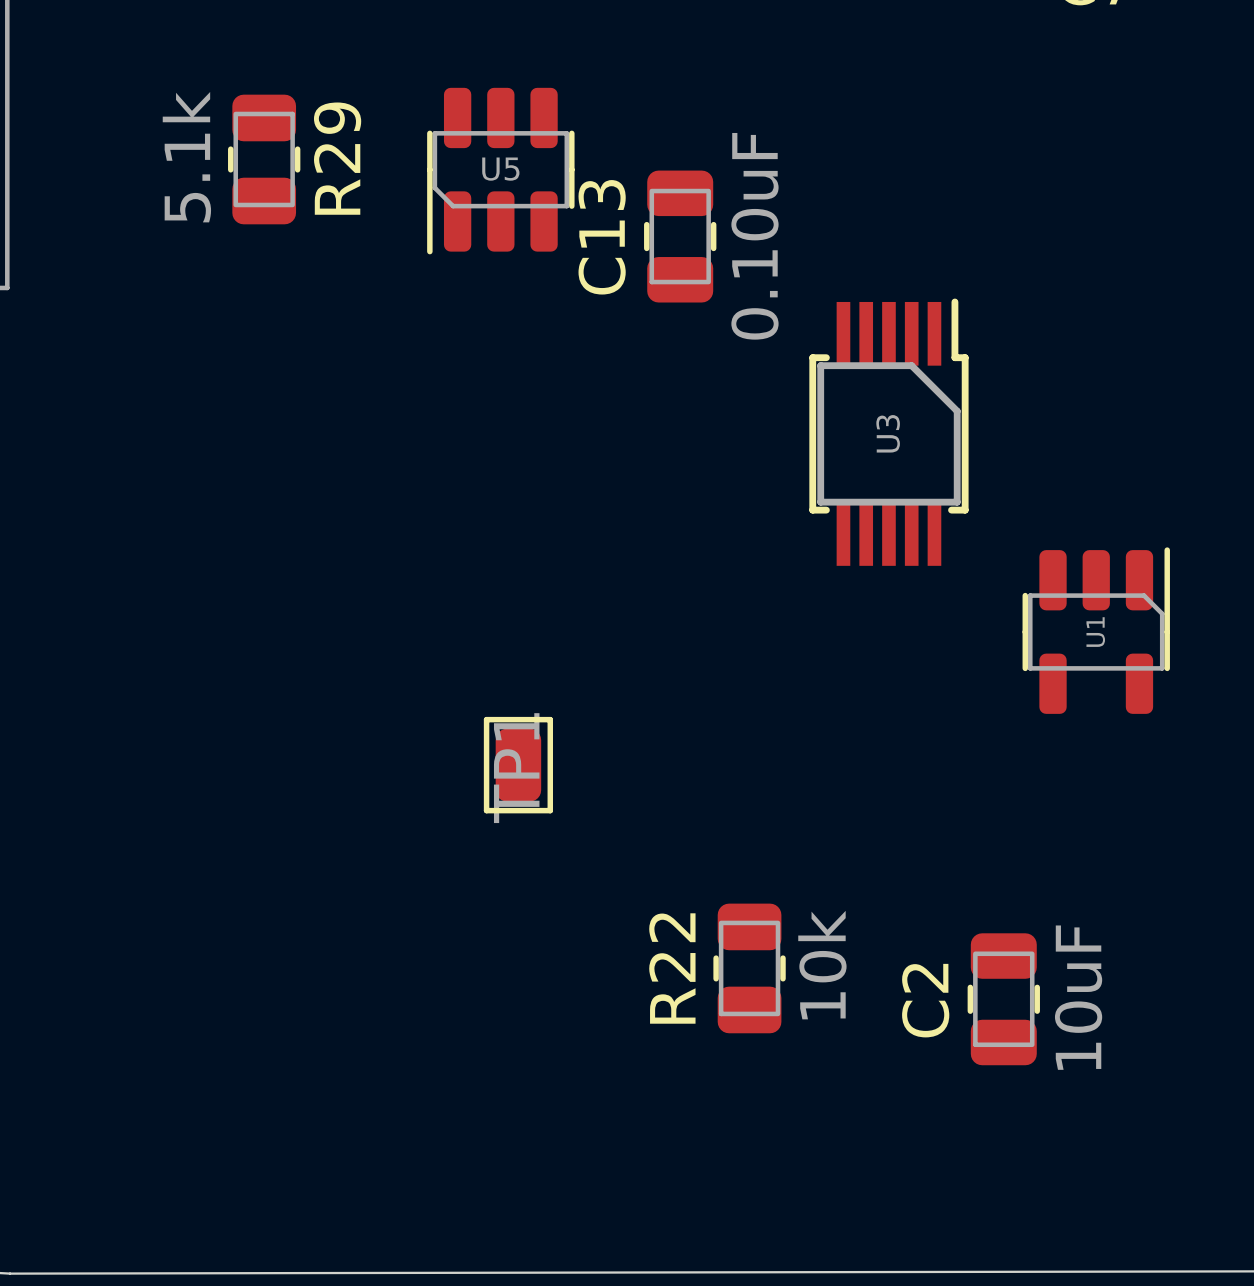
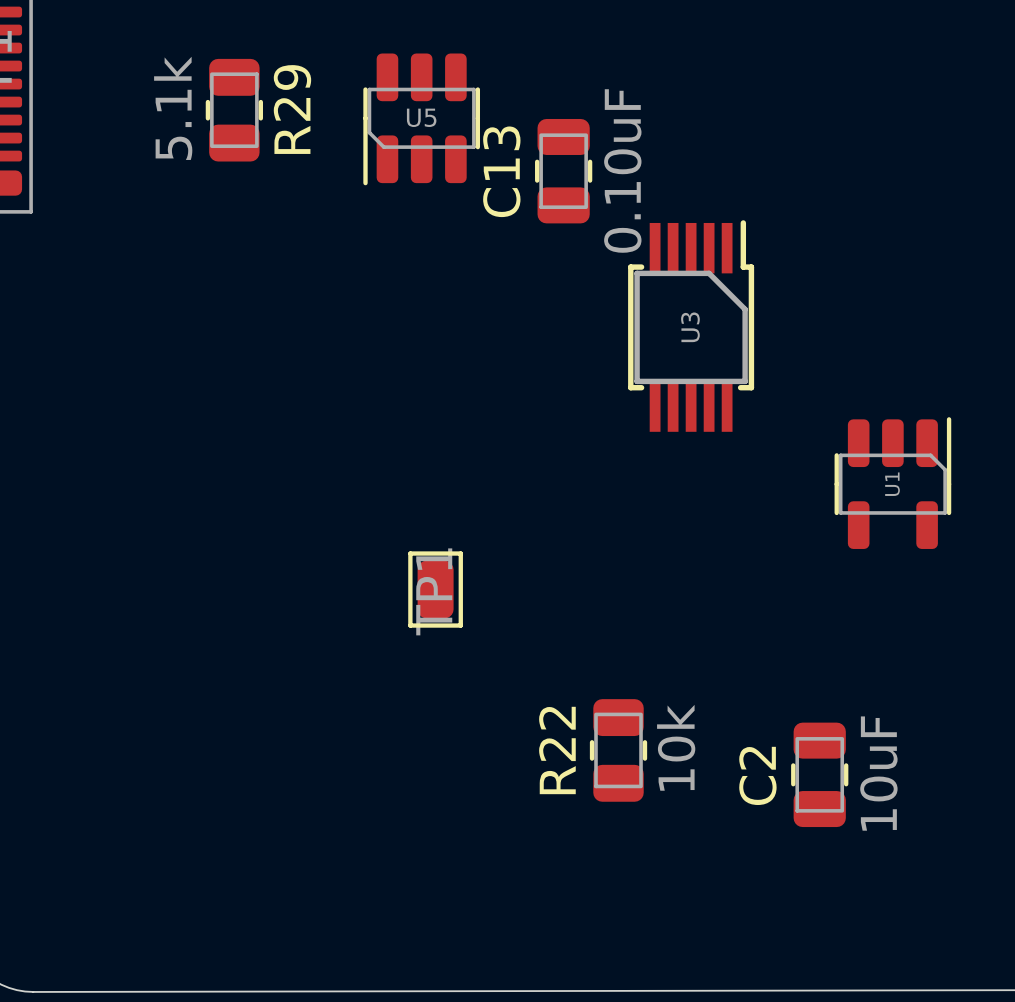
U3 position: (888, 432) -> (691, 326)

